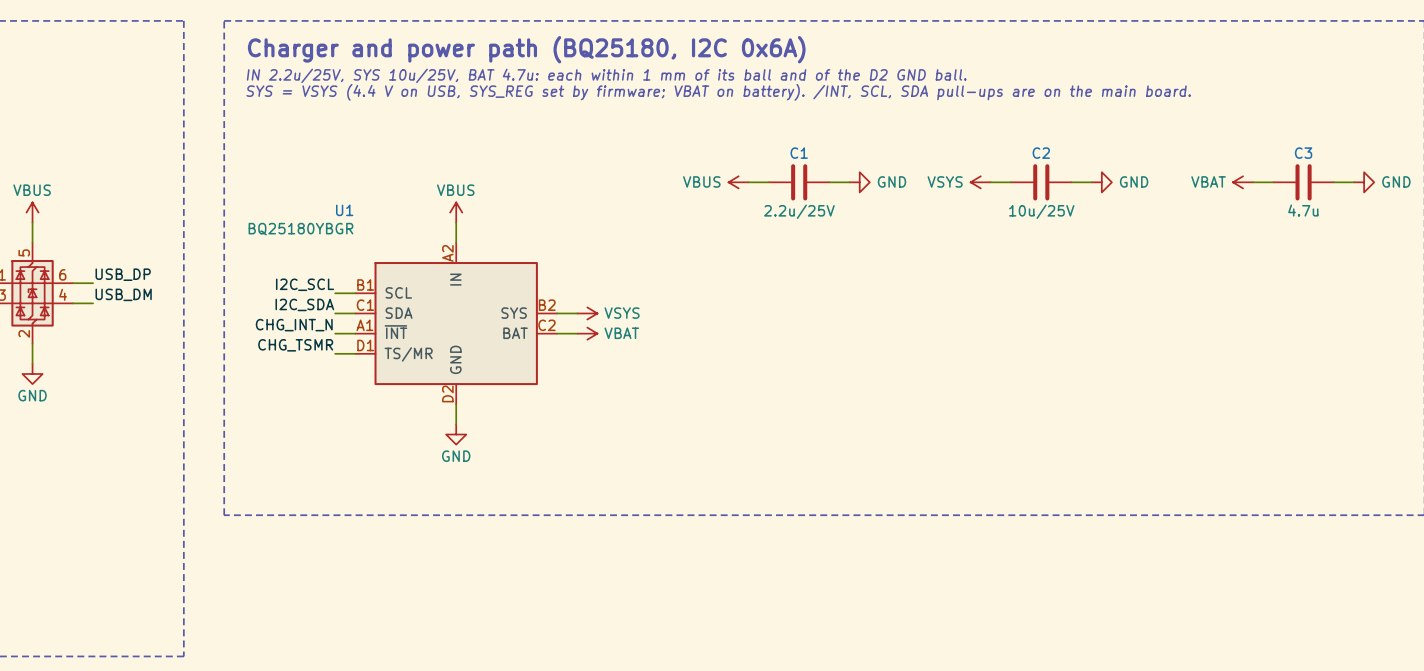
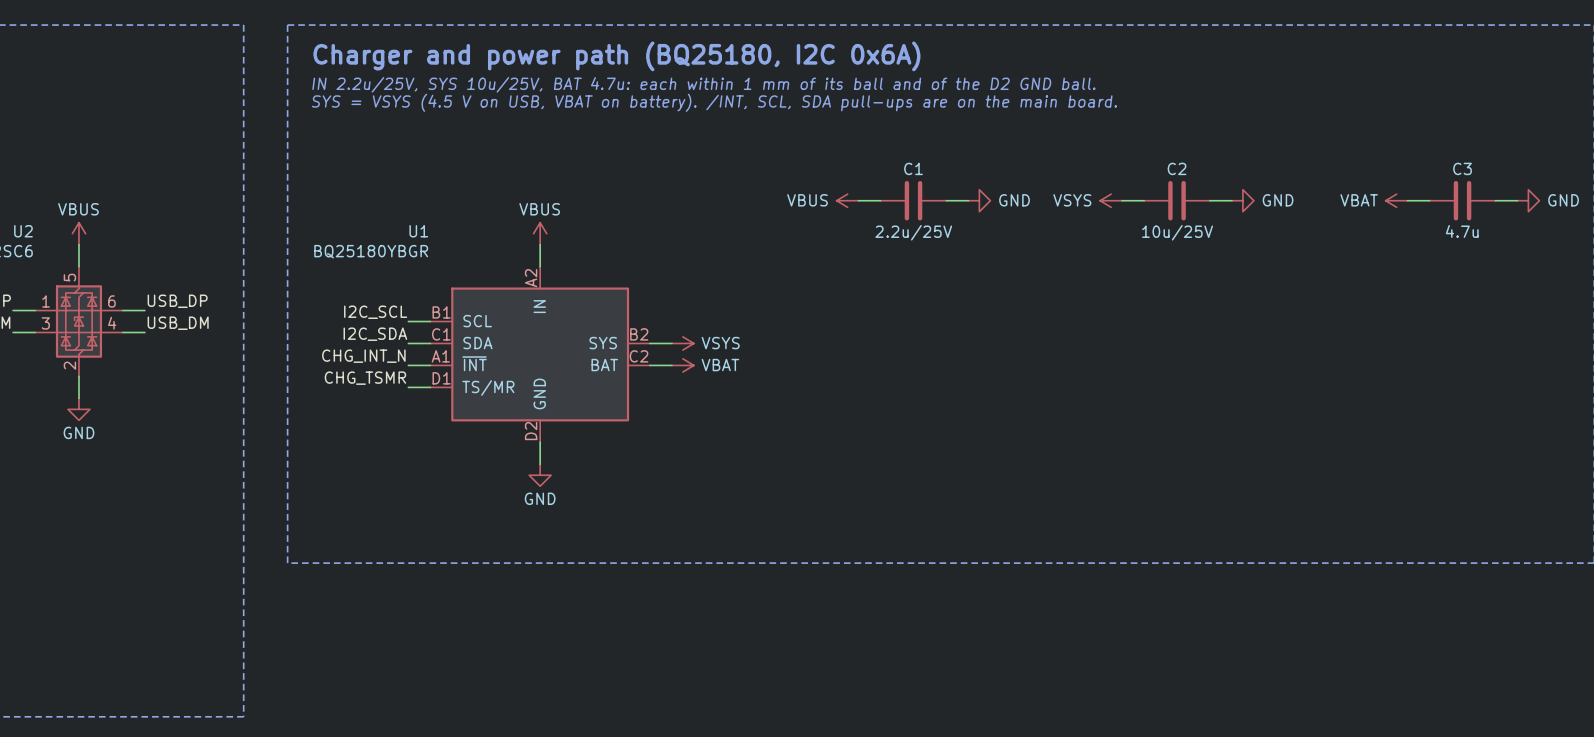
text: SYS = VSYS (4.4 V on USB, SYS_REG set by firmware; VBAT on battery). /INT, SCL, SDA pull-ups are on the main board. (718, 92) -> SYS = VSYS (4.5 V on USB, VBAT on battery). /INT, SCL, SDA pull-ups are on the main board. (714, 102)

